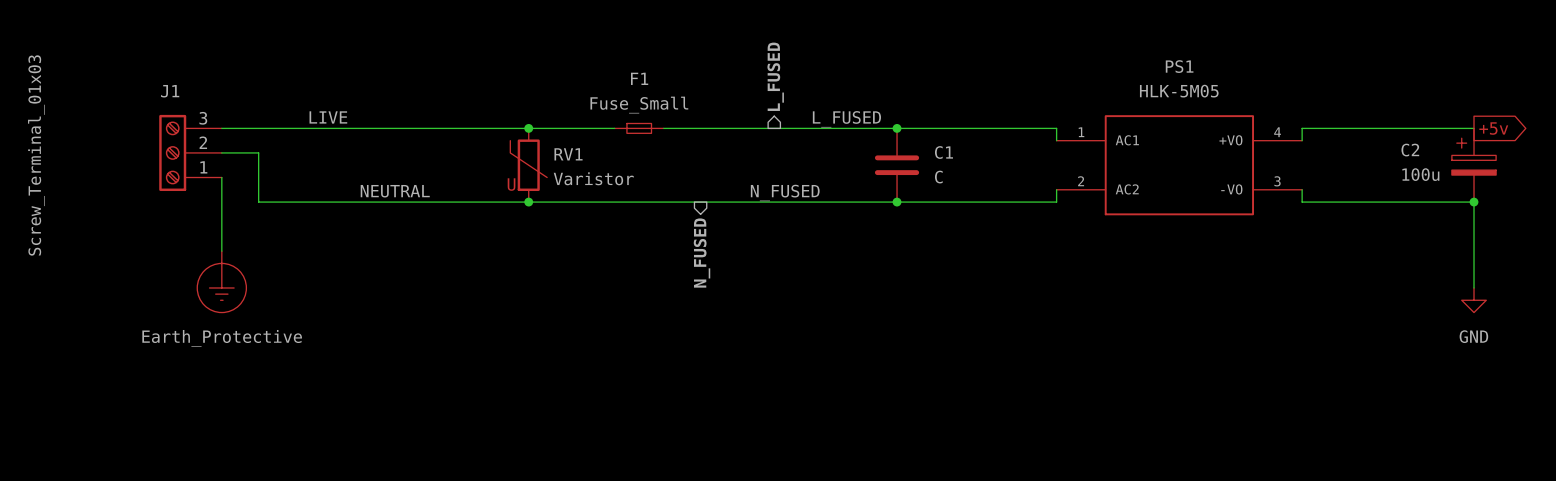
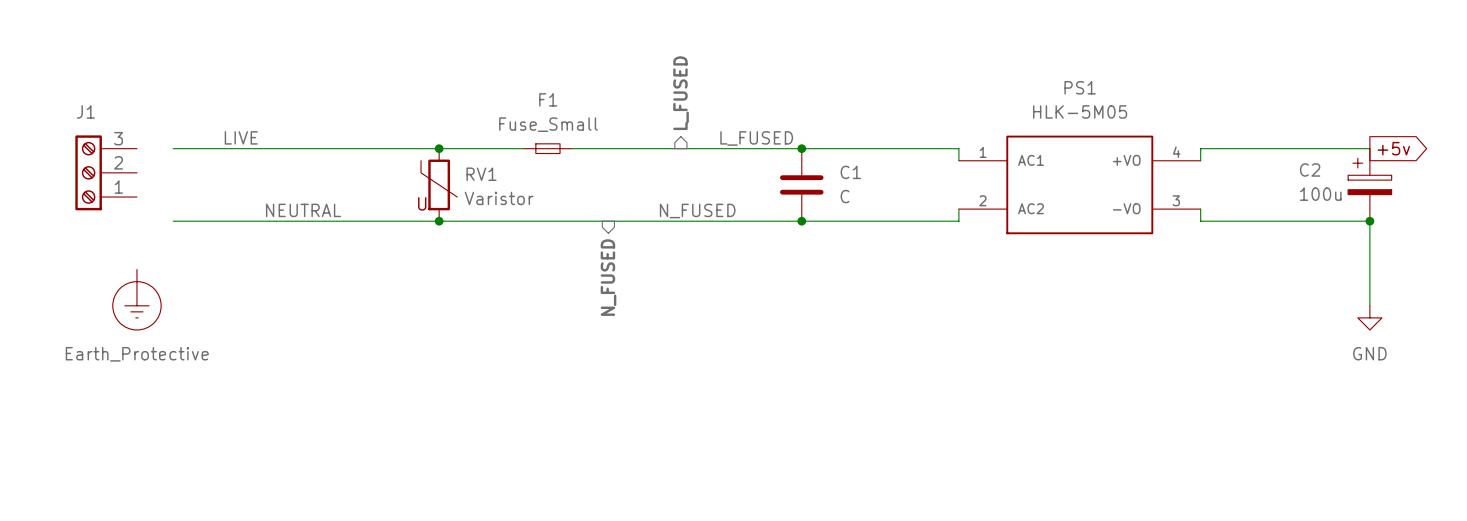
wire: (221, 128) (258, 128) -> none
wire: (221, 152) (258, 152) (258, 202) -> none
wire: (221, 177) (221, 251) -> none

